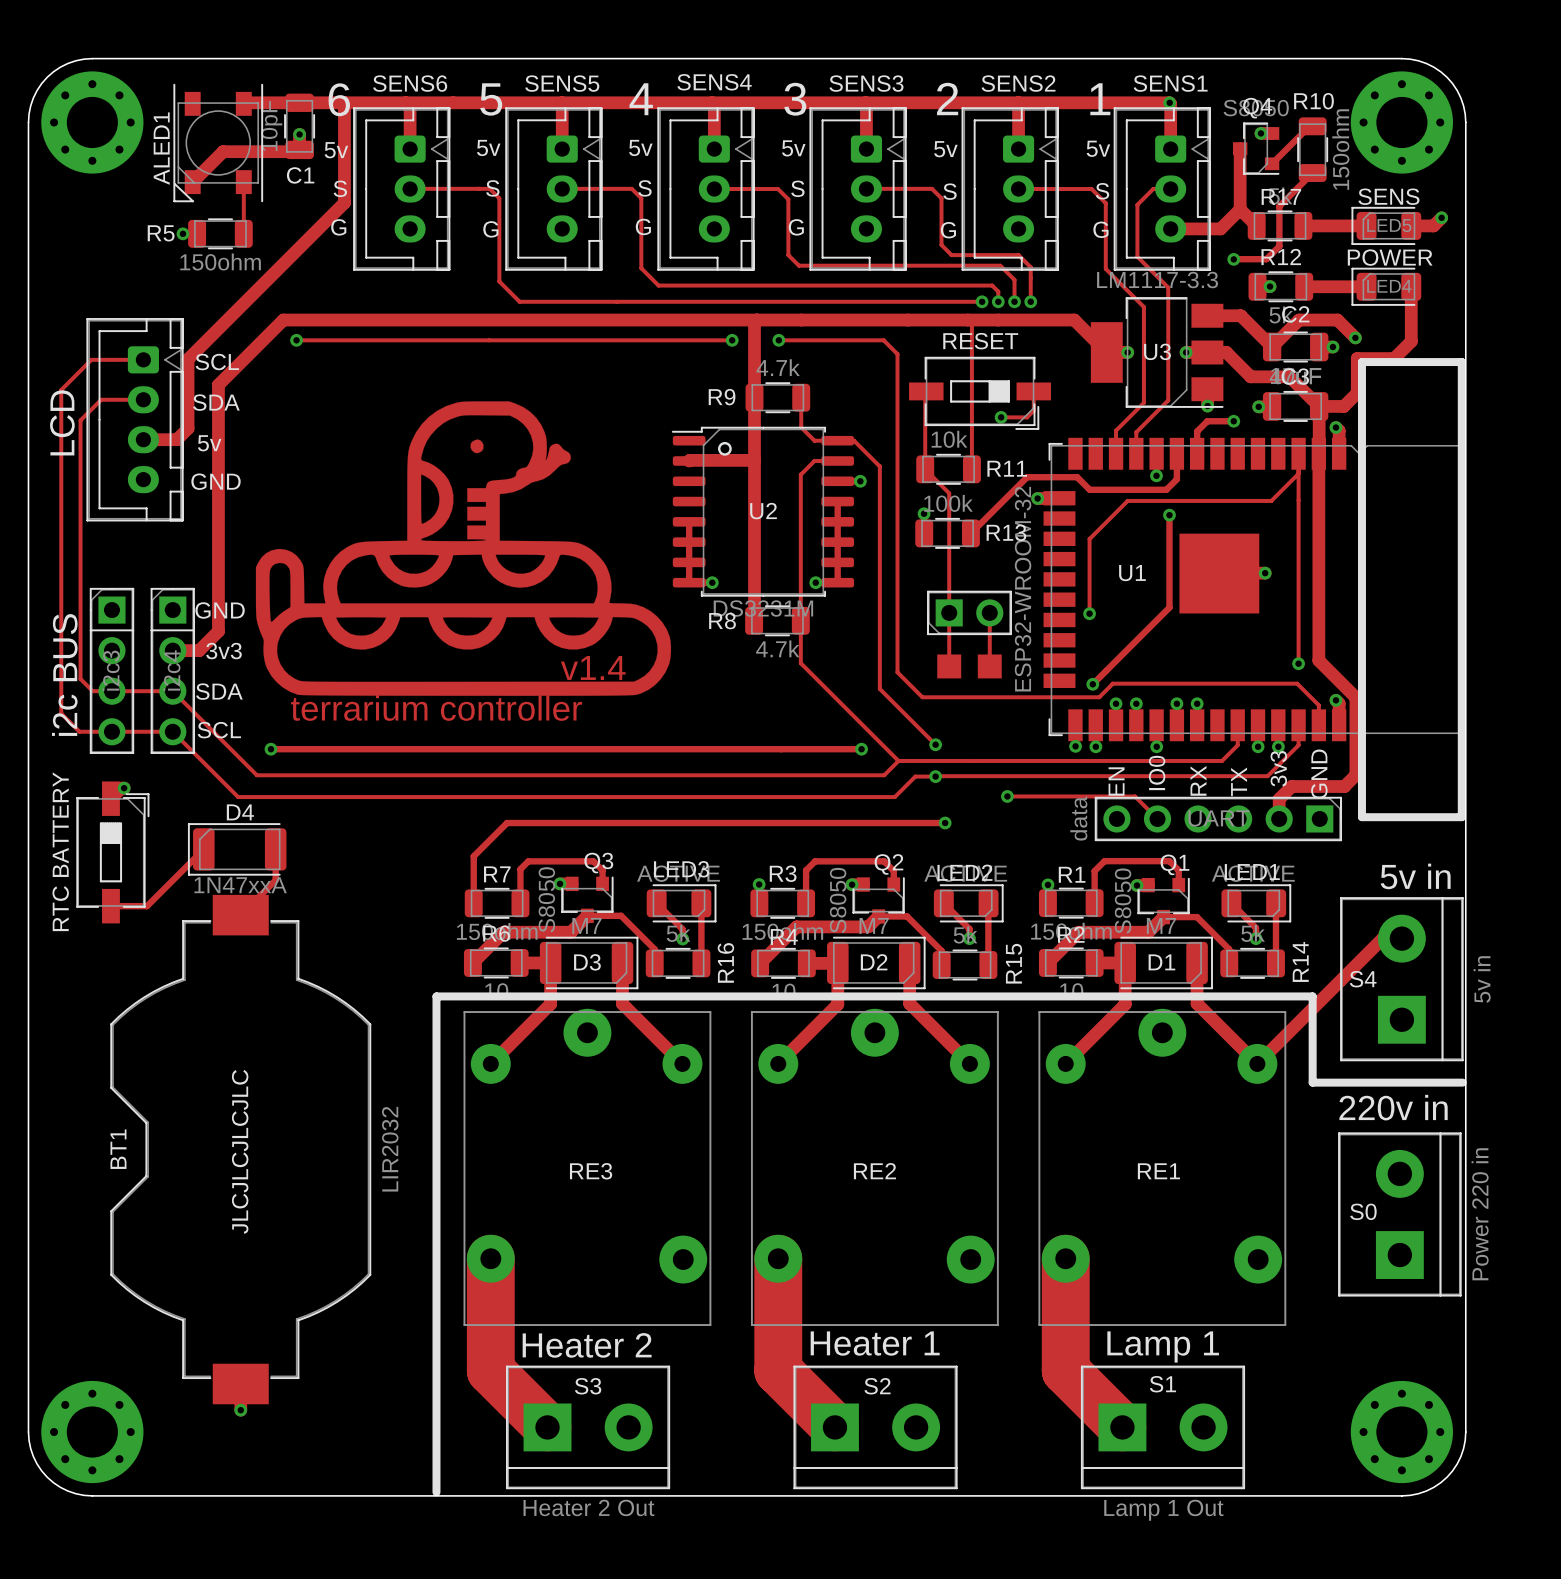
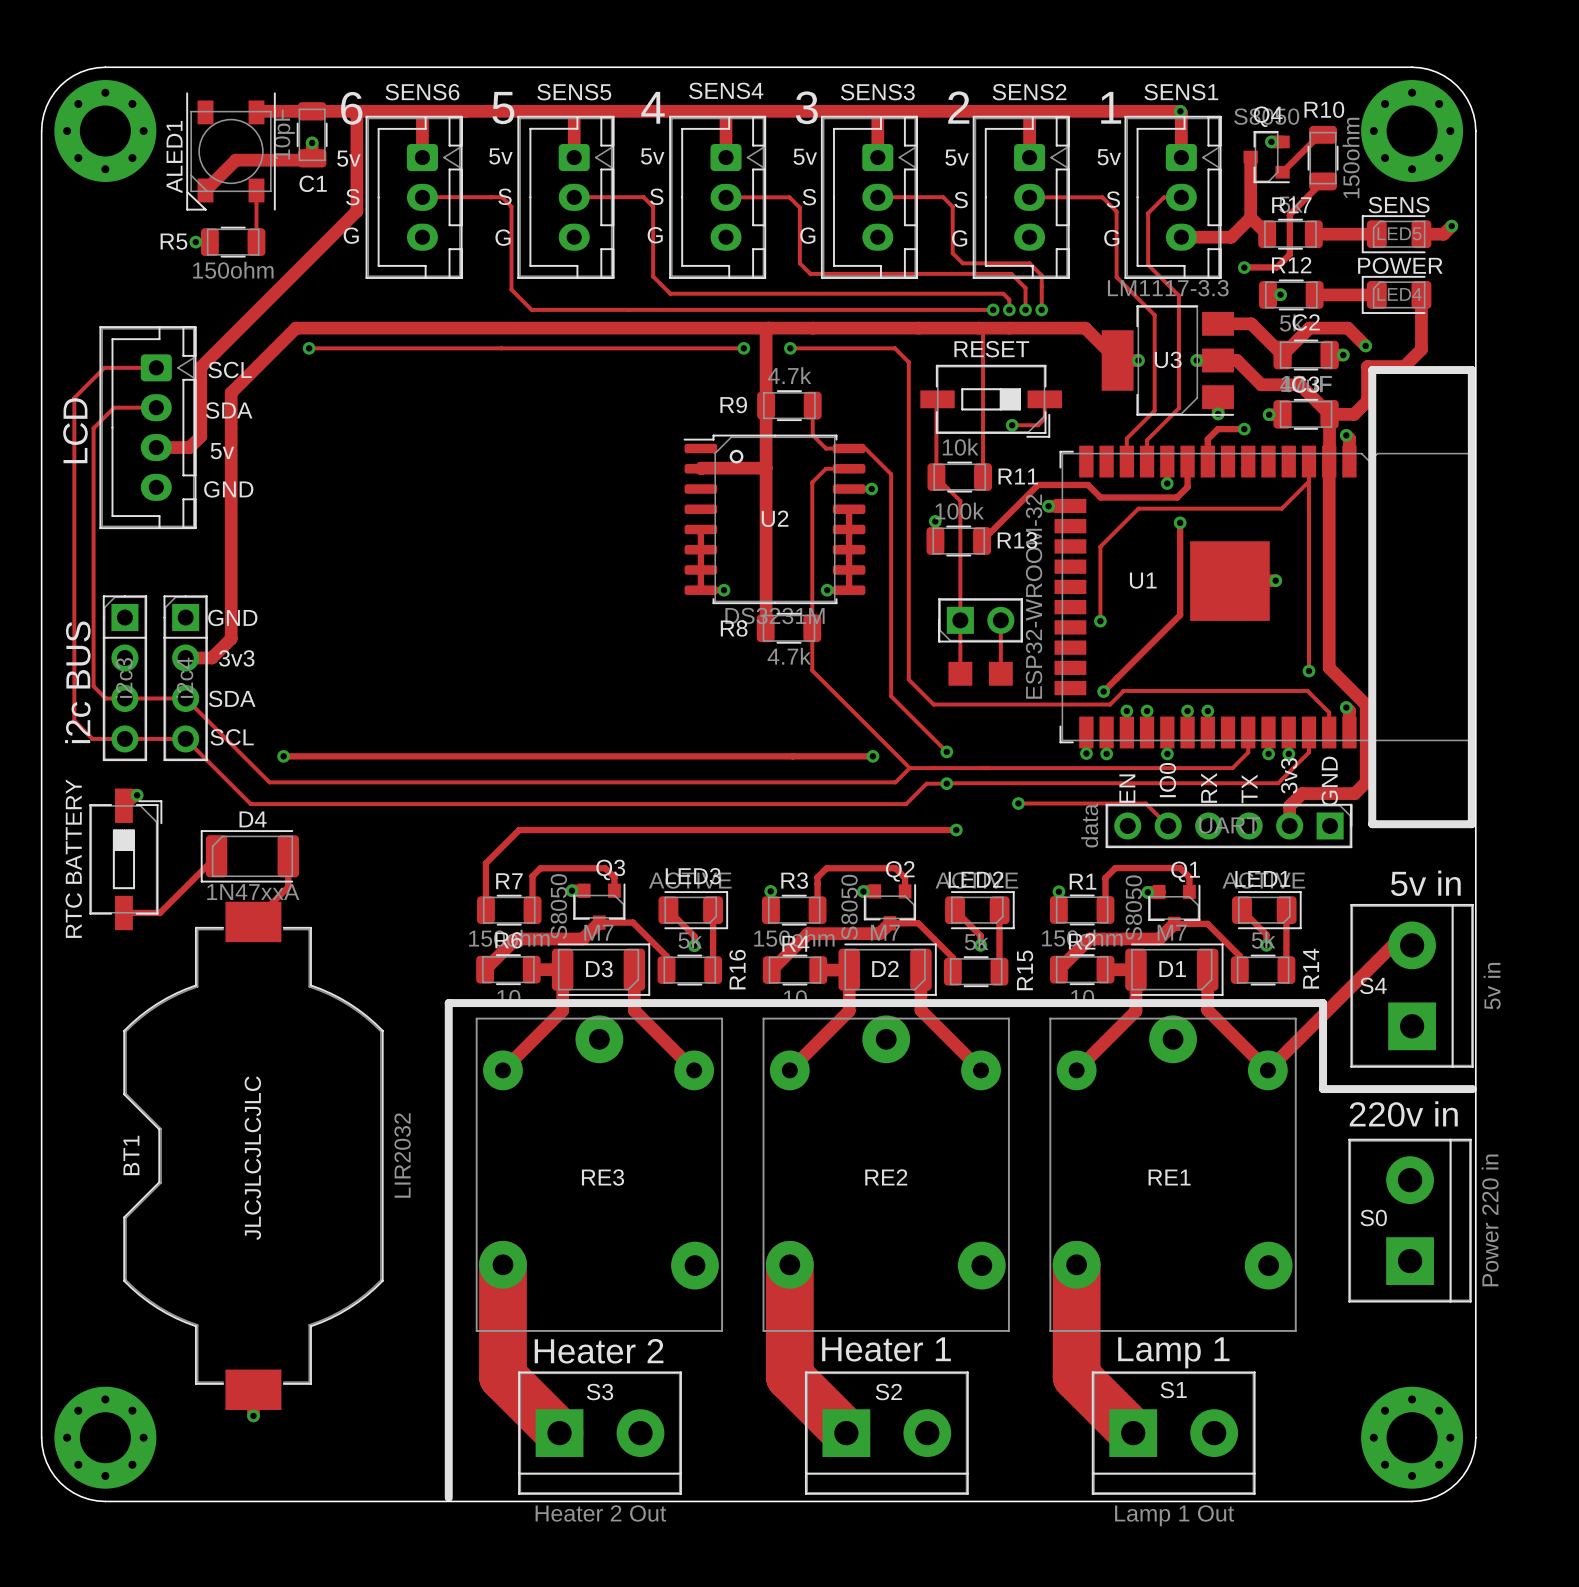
drawing: [255, 401, 672, 696] -> none
text: v1.4 (593, 667) -> none
text: terrarium controller (436, 708) -> none

